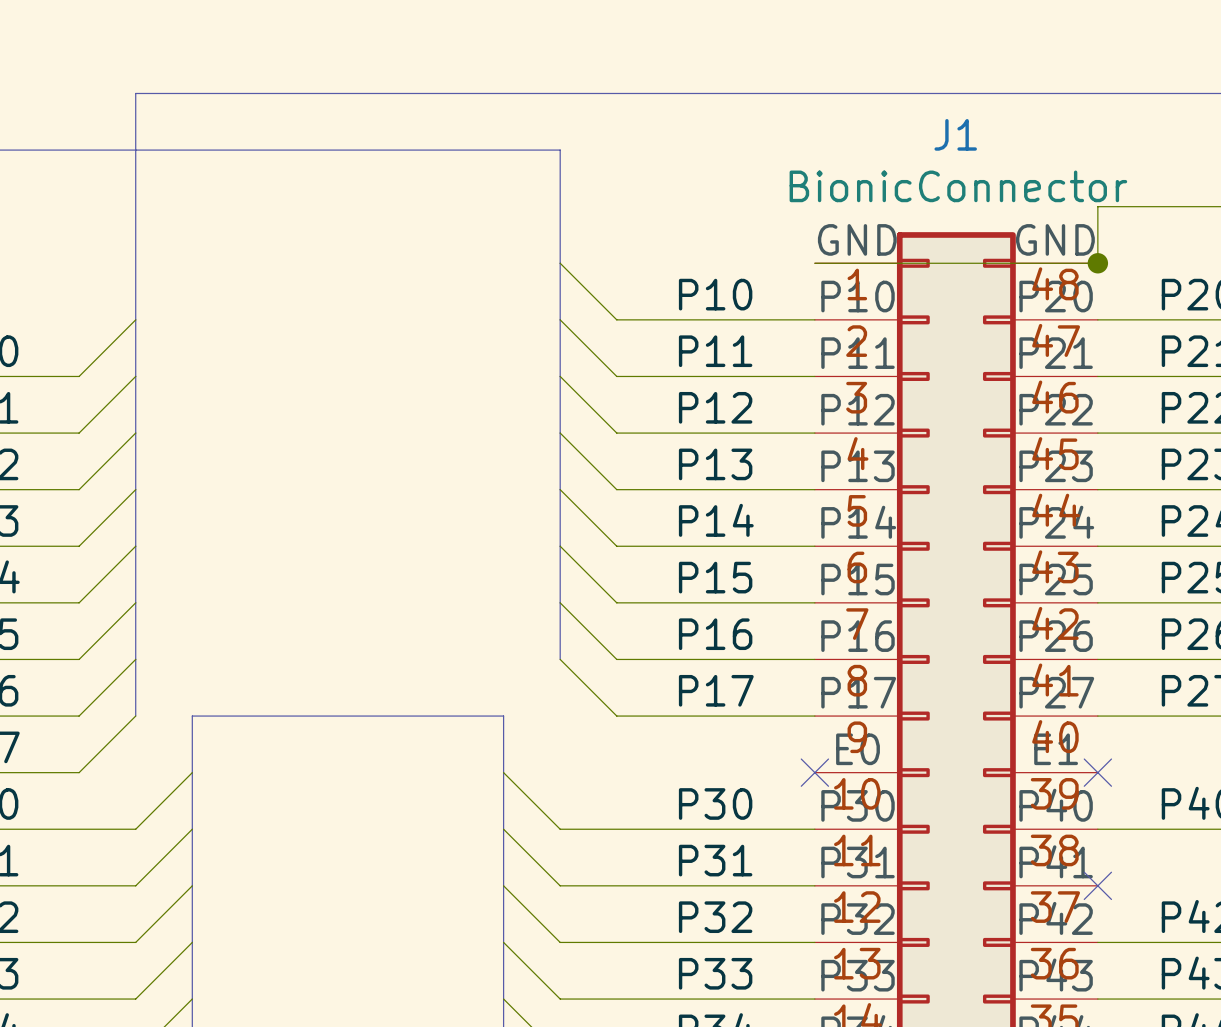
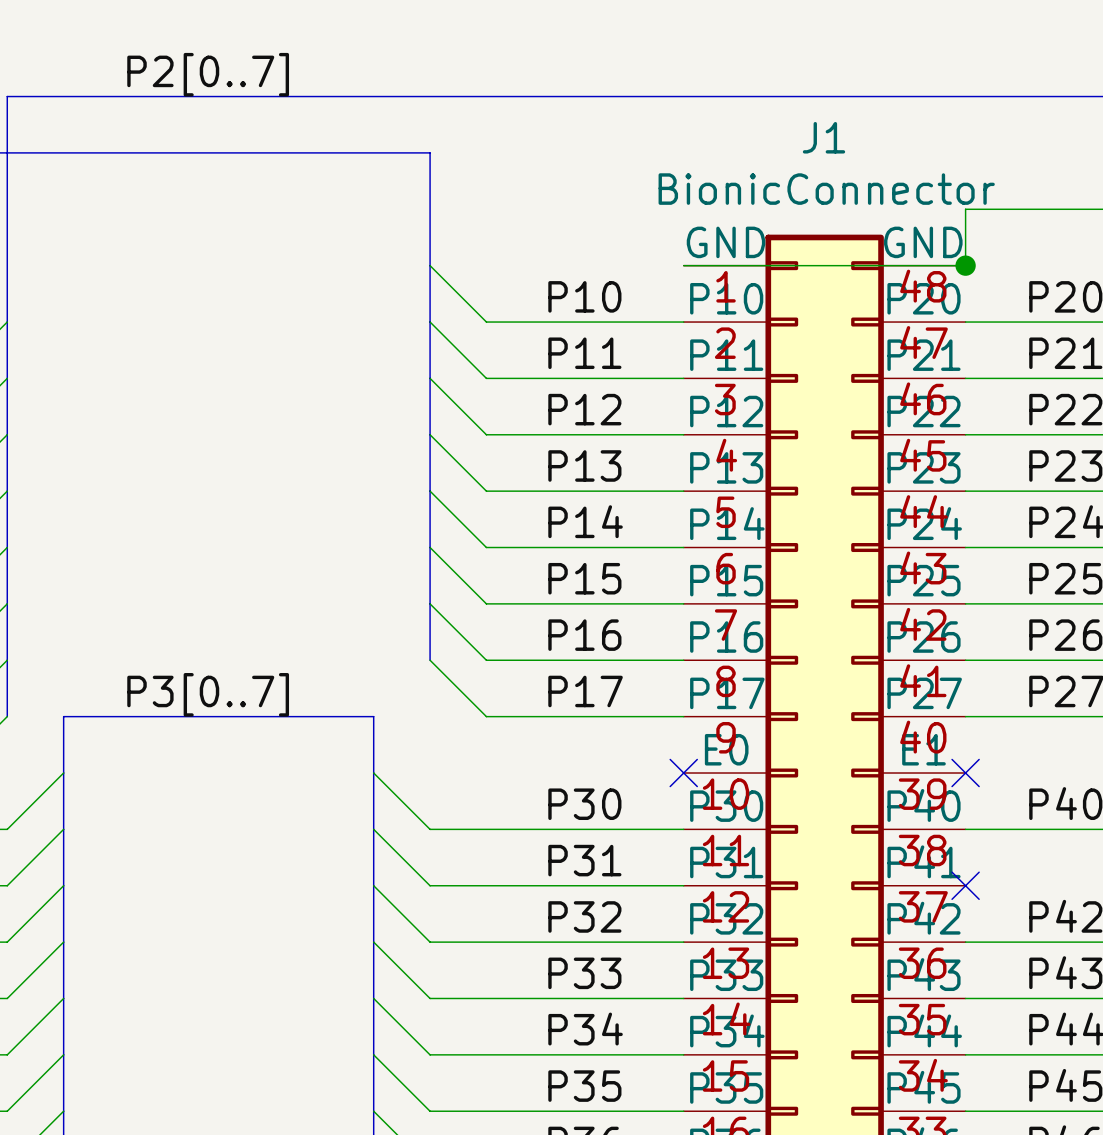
label: none -> P2[0..7] (208, 74)
label: none -> P3[0..7] (208, 694)

